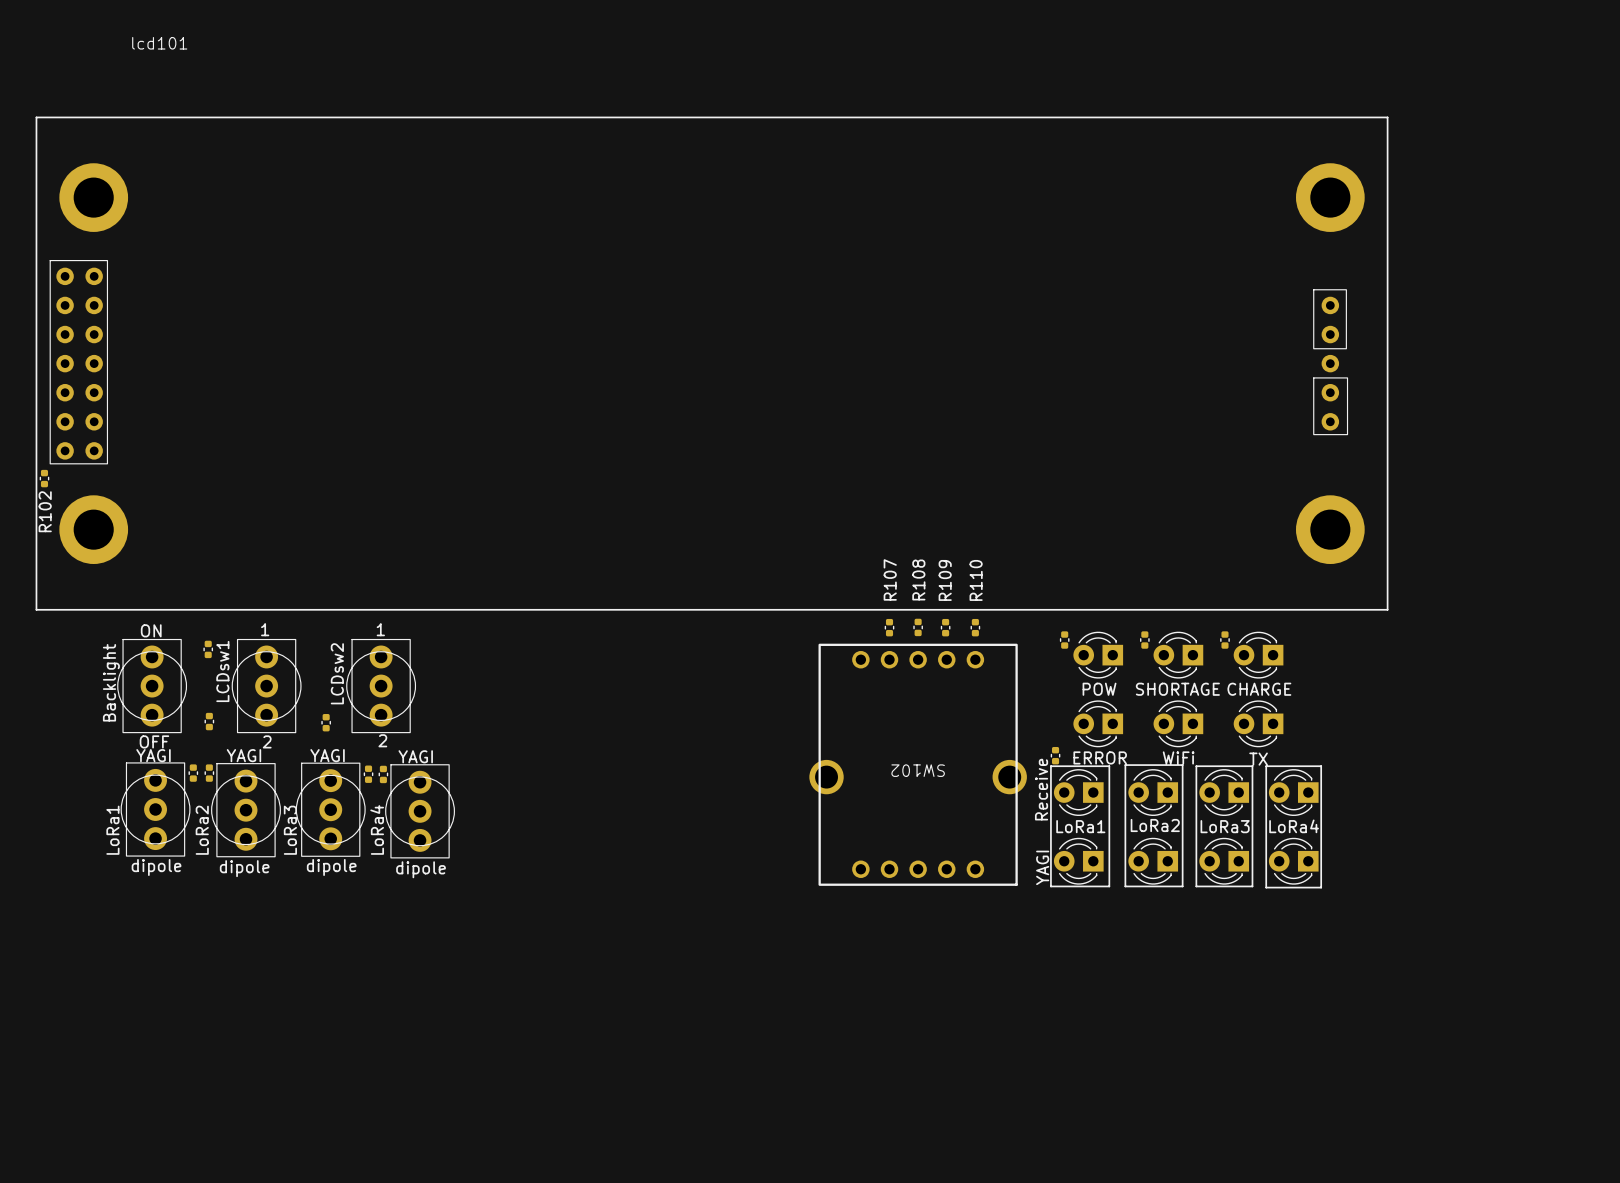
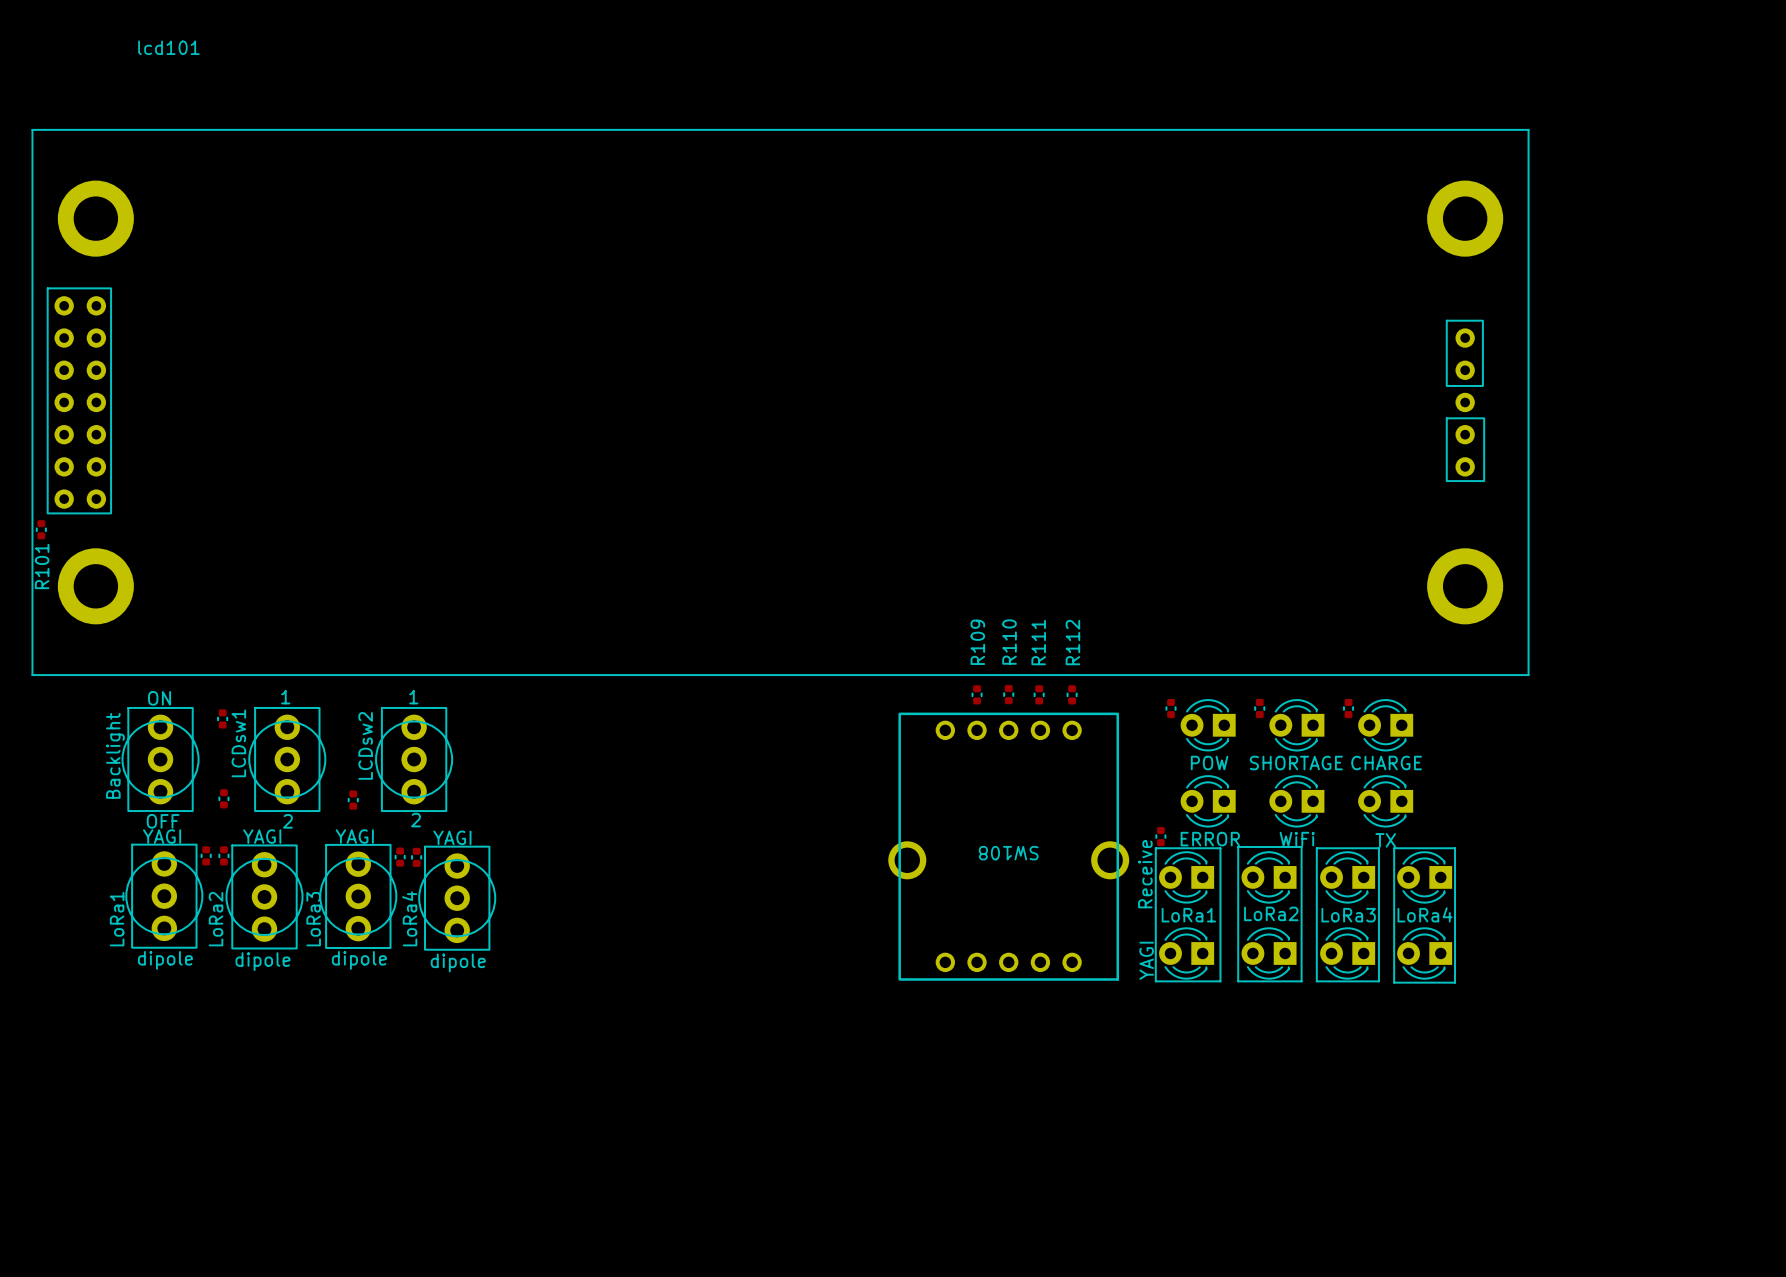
R102 name: R102 (45, 511) -> R101 (42, 566)
R107 name: R107 (890, 579) -> R109 (977, 642)
R108 name: R108 (918, 579) -> R110 (1009, 642)
R109 name: R109 (945, 580) -> R111 (1038, 642)
R110 name: R110 (976, 580) -> R112 (1072, 642)
SW102 name: SW102 (918, 770) -> SW108 (1008, 853)

